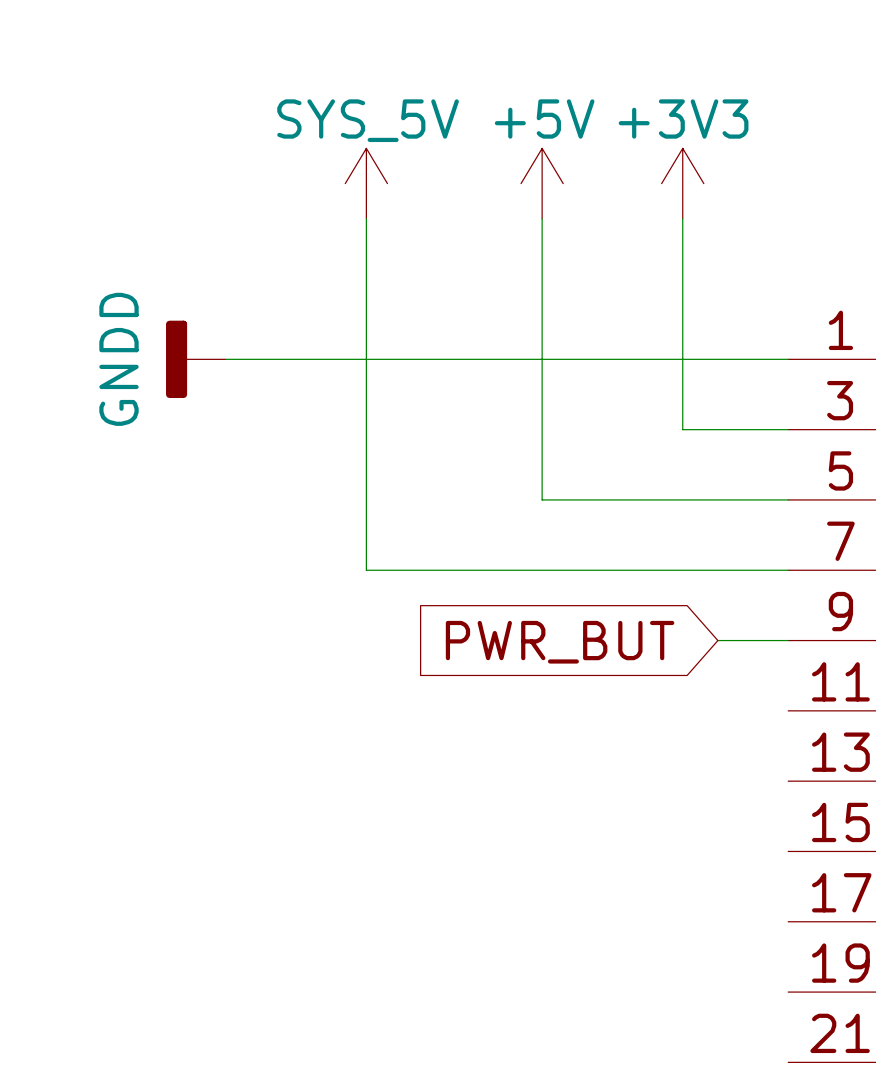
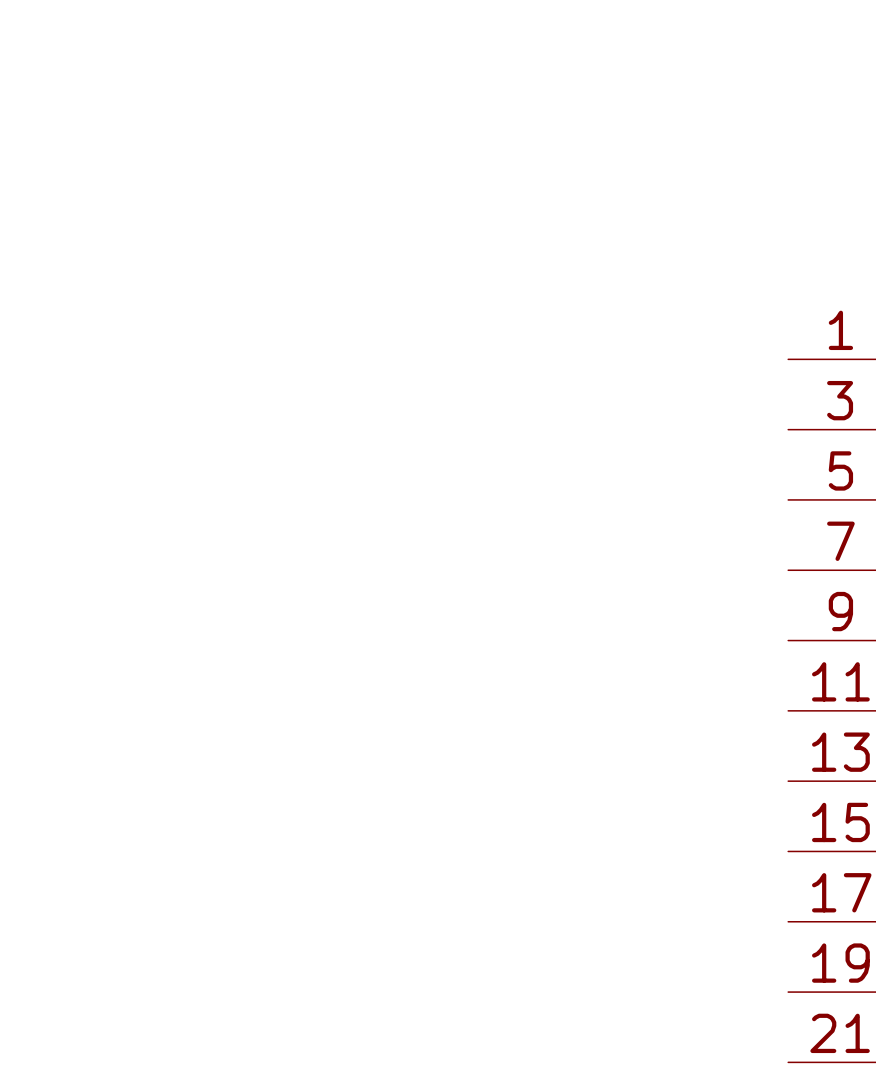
power symbol: SYS_5V (366, 183) -> none
power symbol: +5V (542, 183) -> none
power symbol: +3V3 (682, 183) -> none
wire: (366, 218) (366, 570) (788, 570) -> none
wire: (542, 218) (542, 499) (788, 499) -> none
wire: (682, 218) (682, 429) (788, 429) -> none
power symbol: GNDD (195, 359) -> none
wire: (225, 359) (788, 359) -> none
wire: (717, 640) (788, 640) -> none
global label: PWR_BUT (560, 642) -> none

